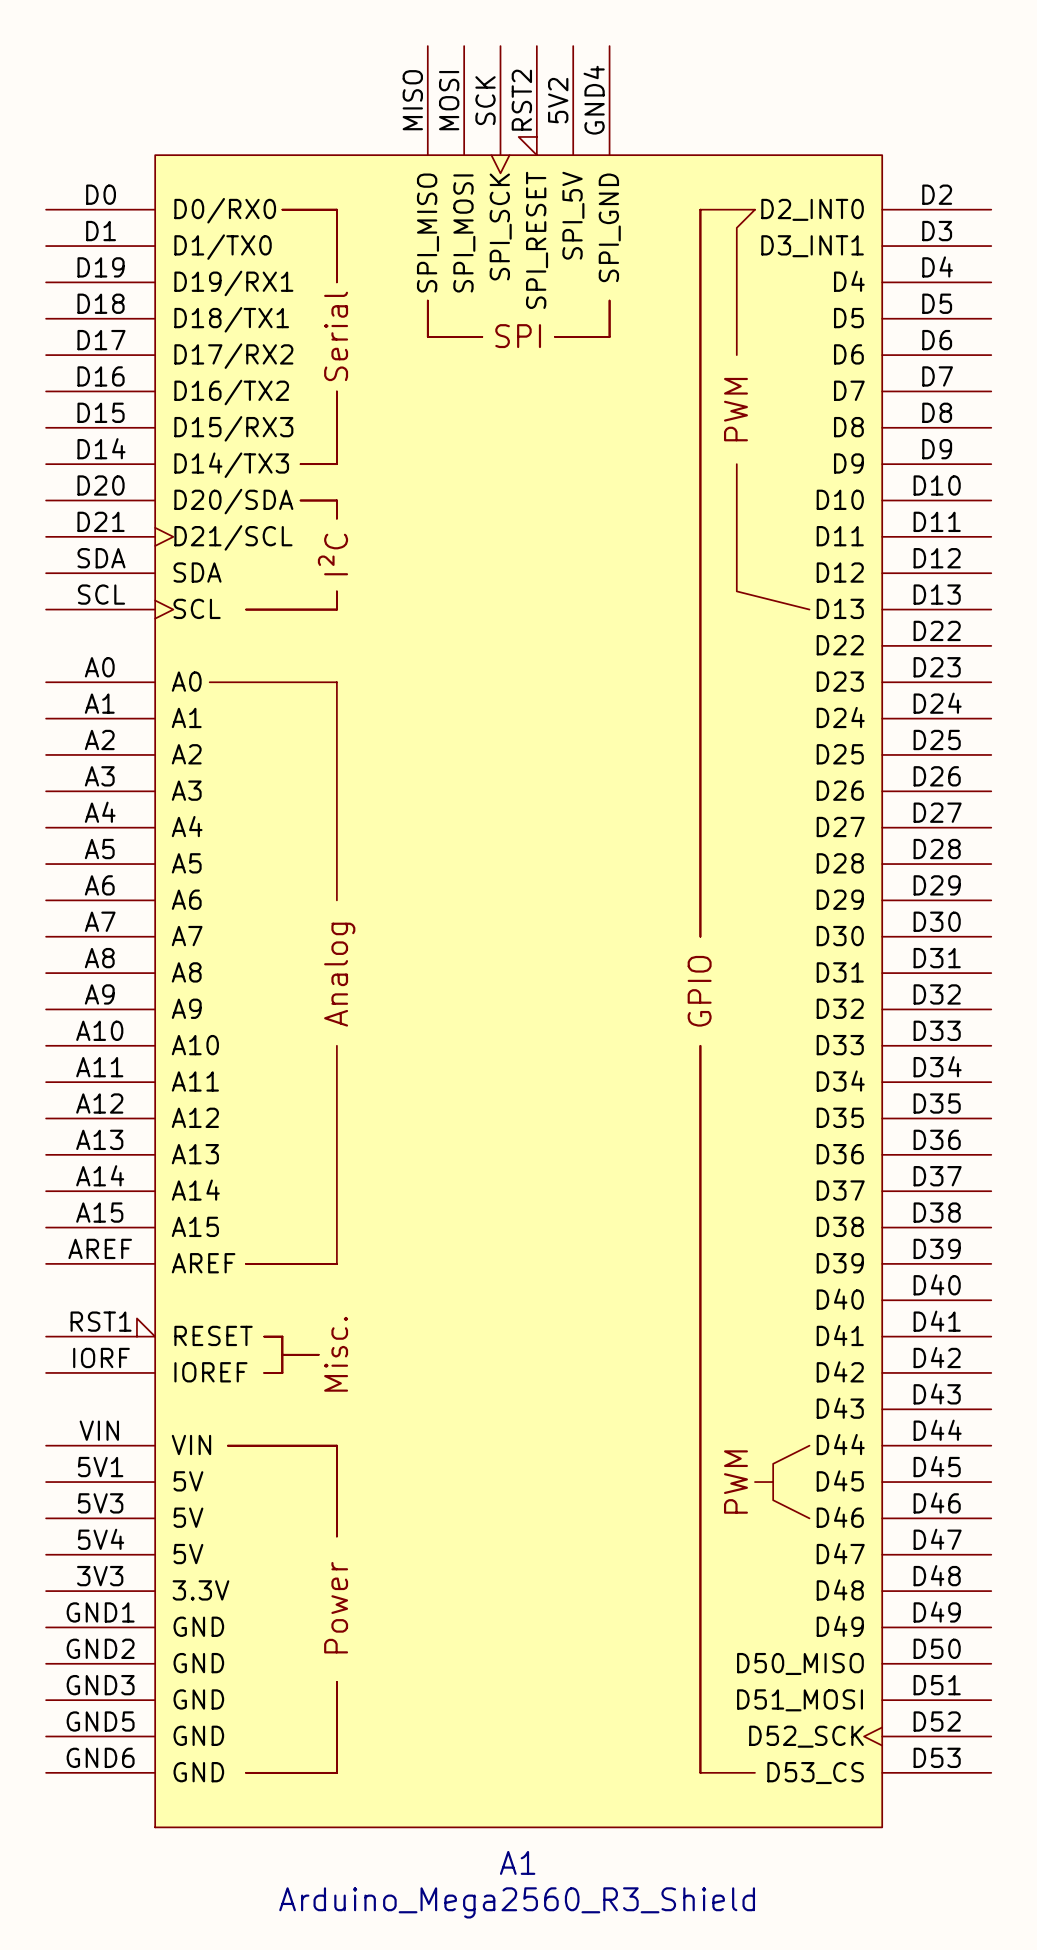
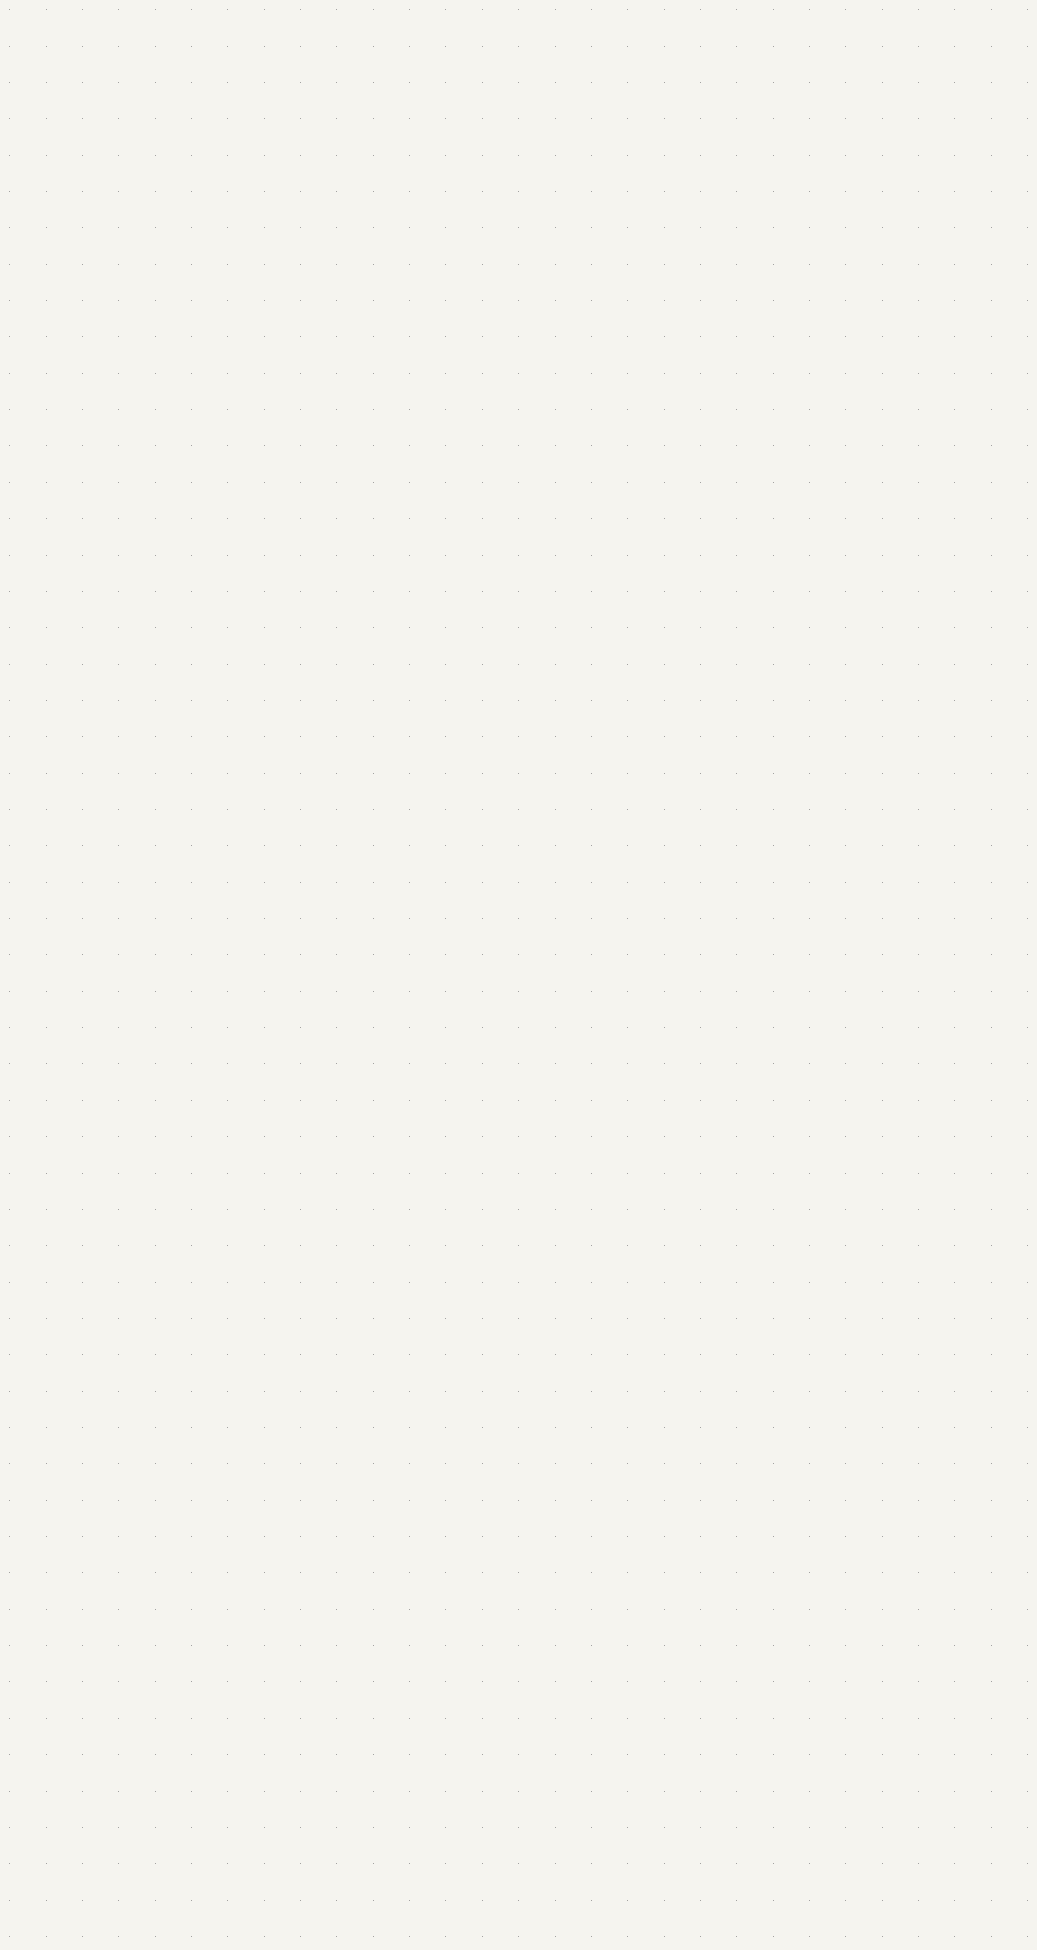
A1: Arduino_Mega2560_R3_Shield (518, 936) -> none

